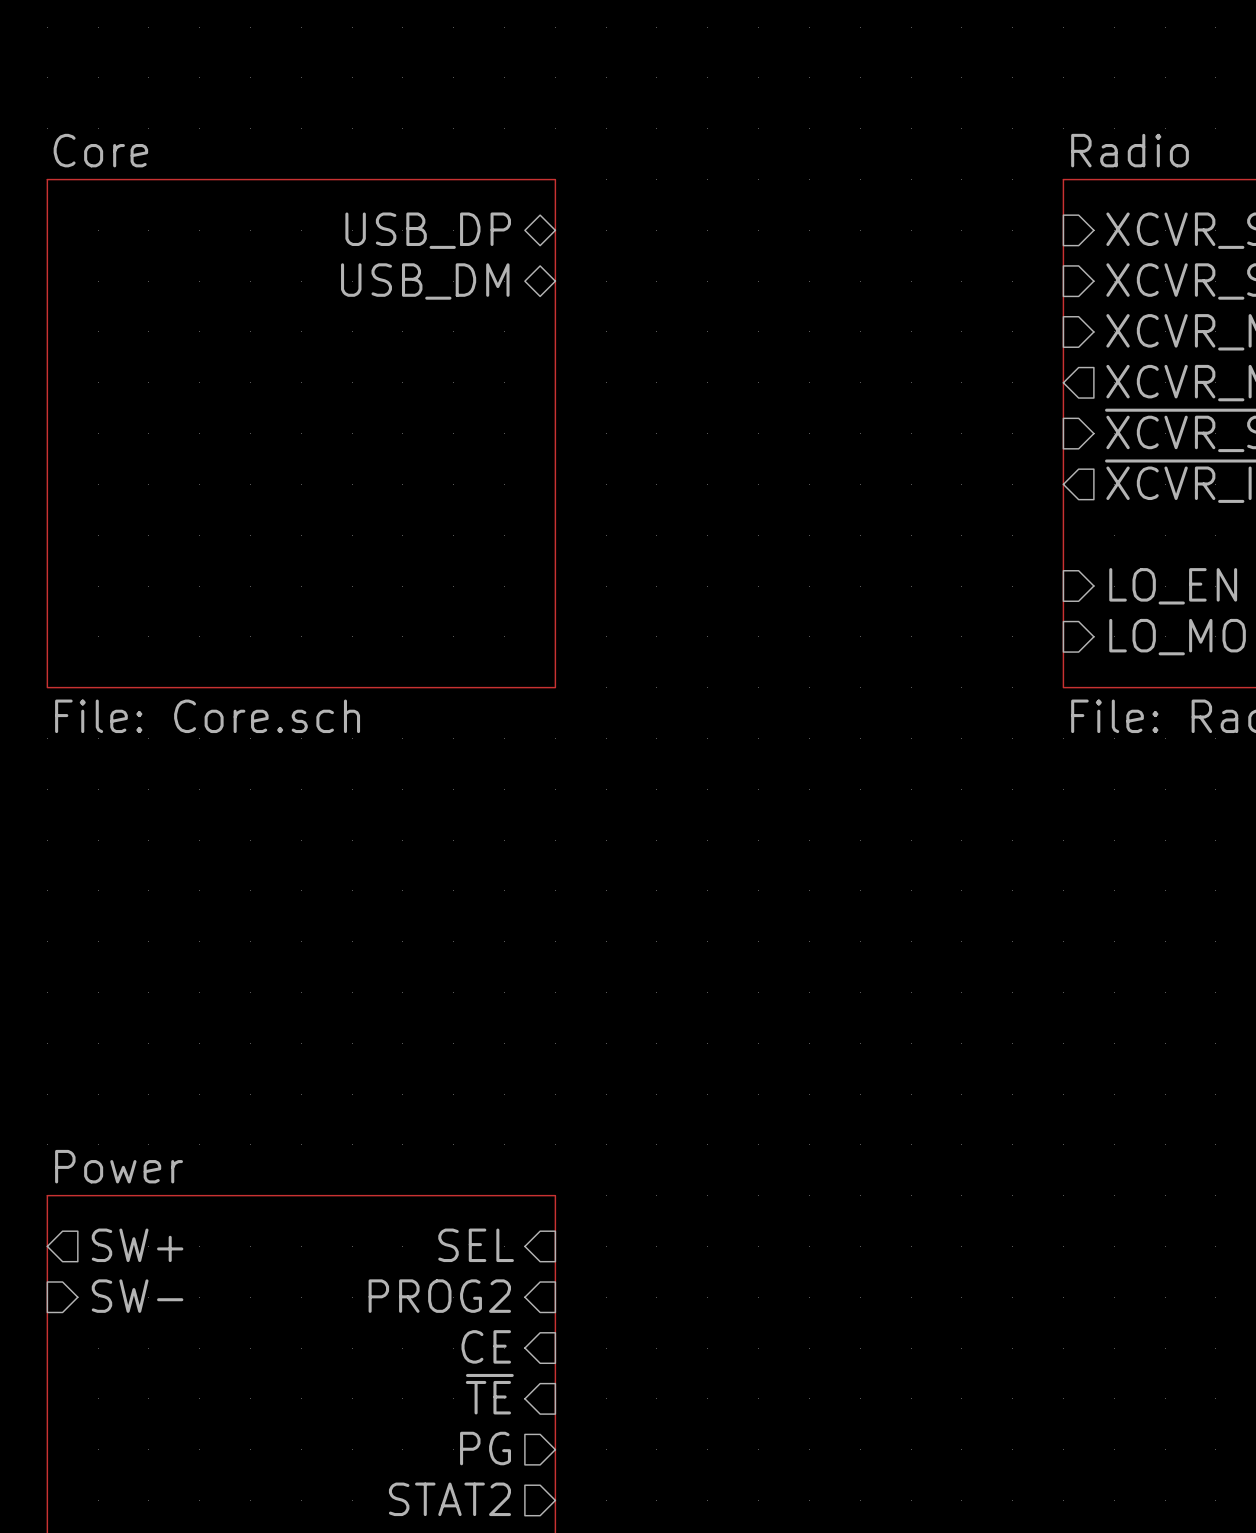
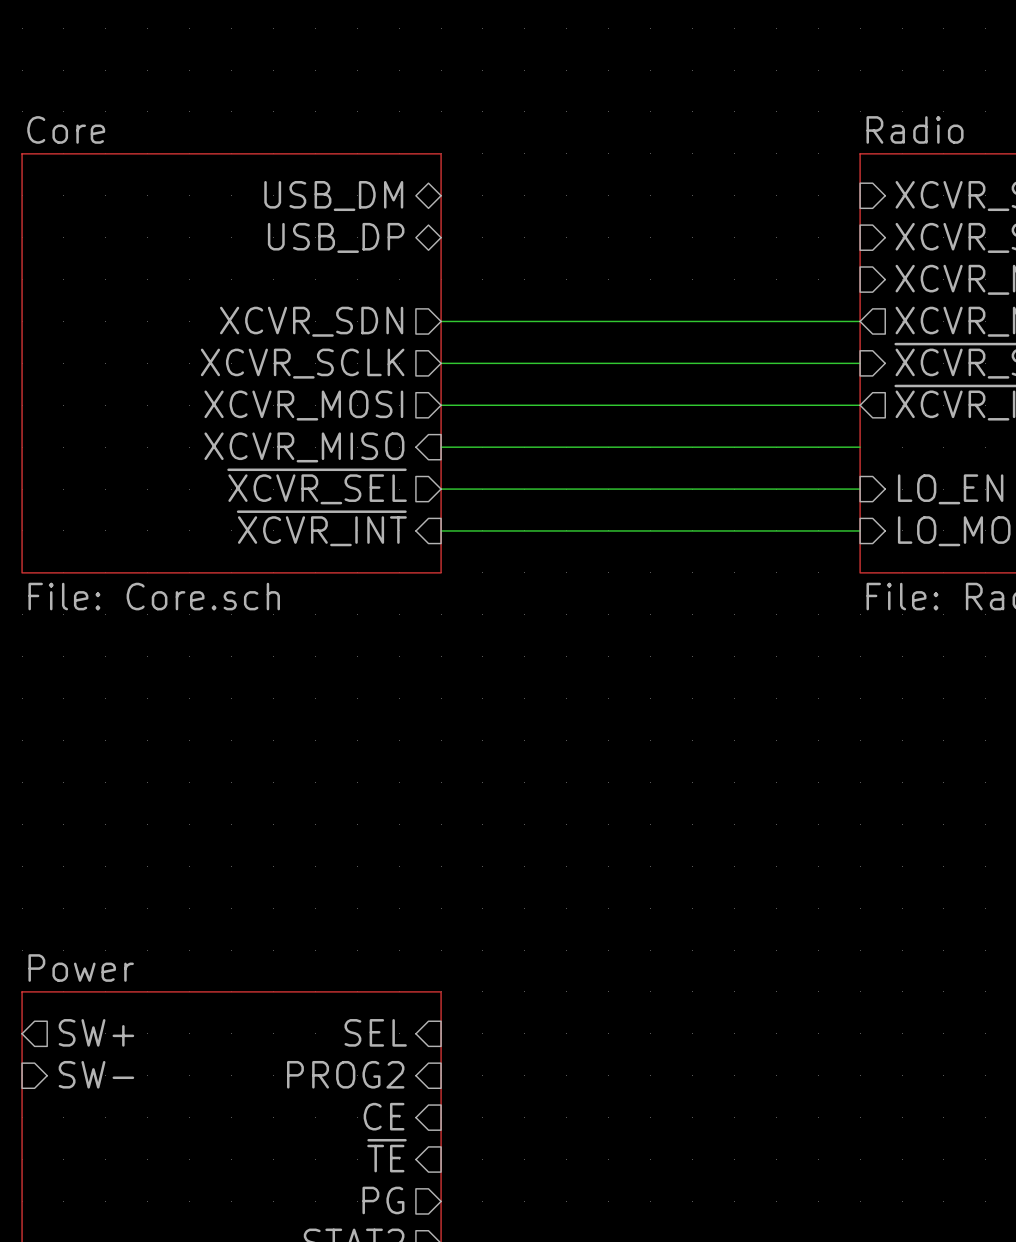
sheet pin: USB_DP (428, 230) -> USB_DM (333, 196)
sheet pin: USB_DM (425, 281) -> USB_DP (336, 237)
wire: none -> (441, 321) (860, 321)
sheet pin: none -> XCVR_SDN (311, 321)
sheet pin: none -> XCVR_SCLK (302, 363)
wire: none -> (441, 363) (860, 363)
sheet pin: none -> XCVR_MOSI (303, 405)
wire: none -> (441, 405) (860, 405)
sheet pin: none -> XCVR_MISO (304, 447)
wire: none -> (441, 447) (860, 447)
sheet pin: none -> ~{XCVR_SEL} (317, 486)
wire: none -> (441, 489) (860, 489)
sheet pin: none -> ~{XCVR_INT} (321, 528)
wire: none -> (441, 530) (860, 530)

